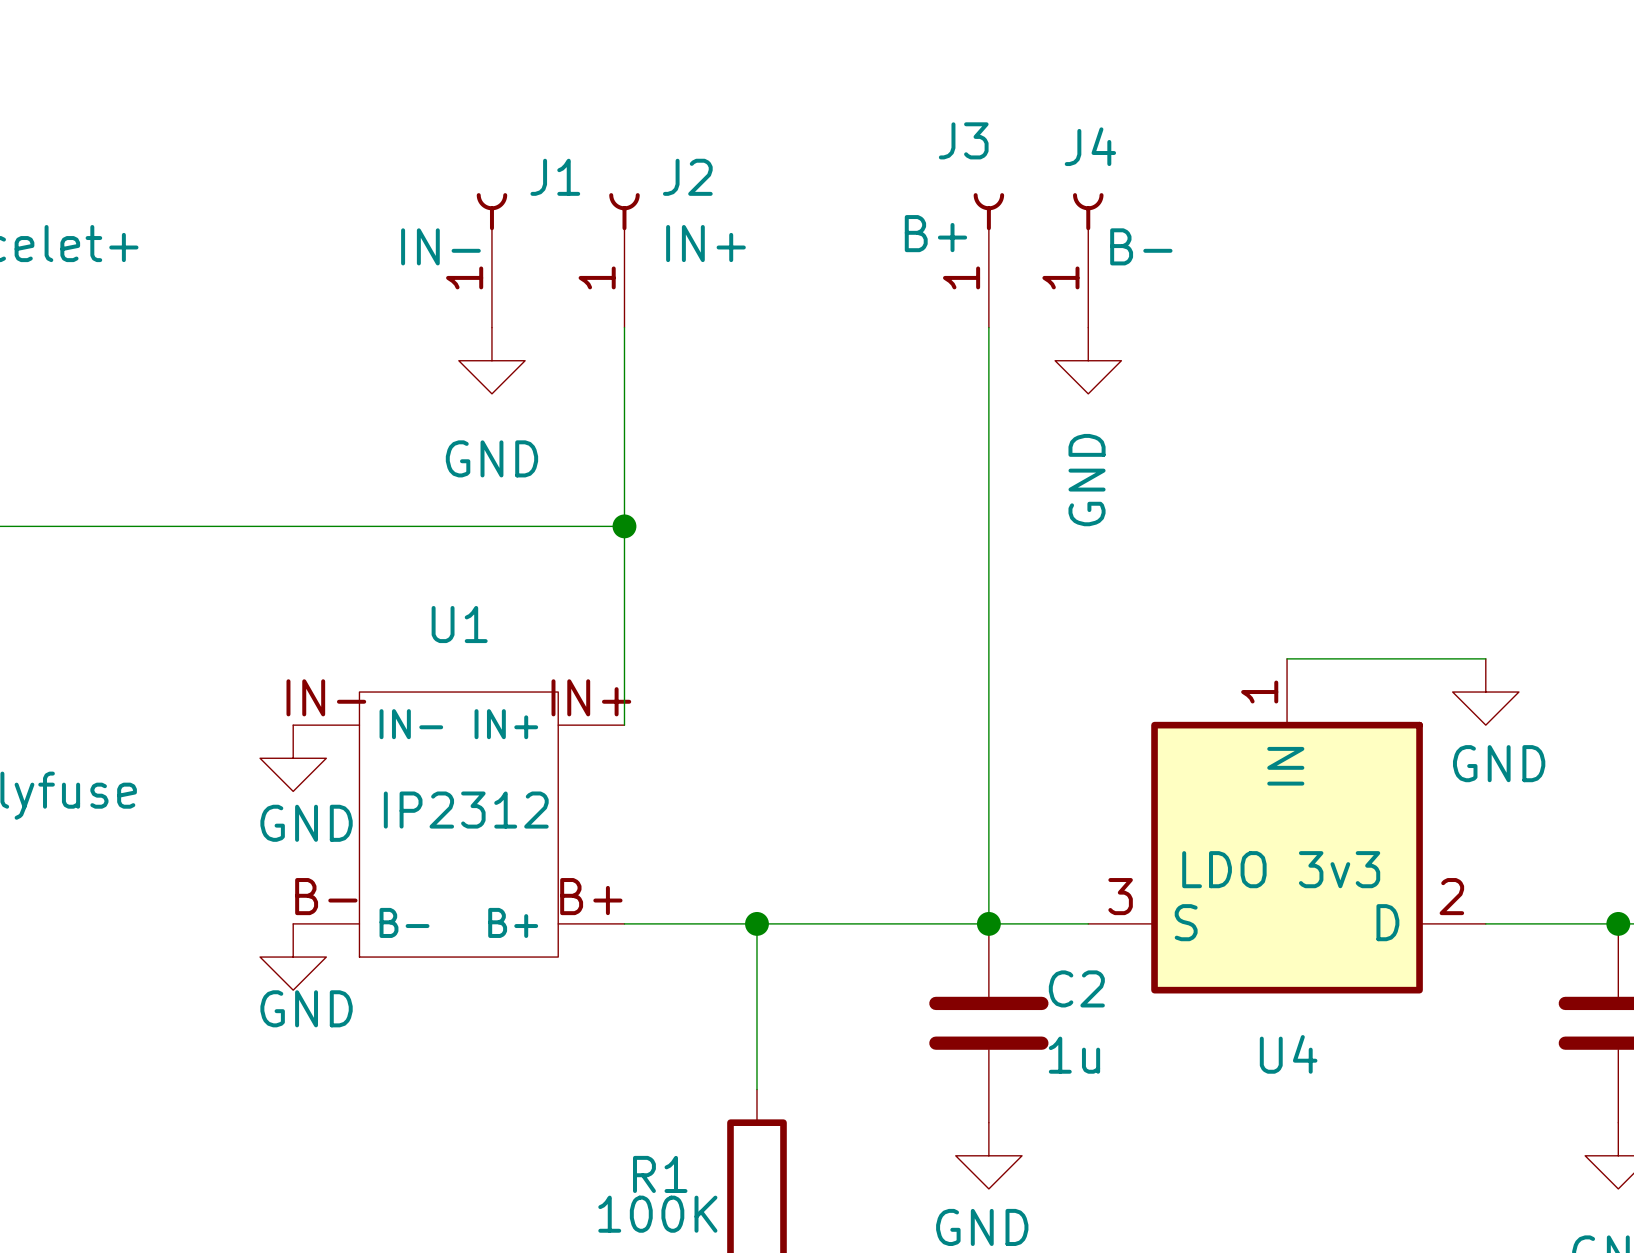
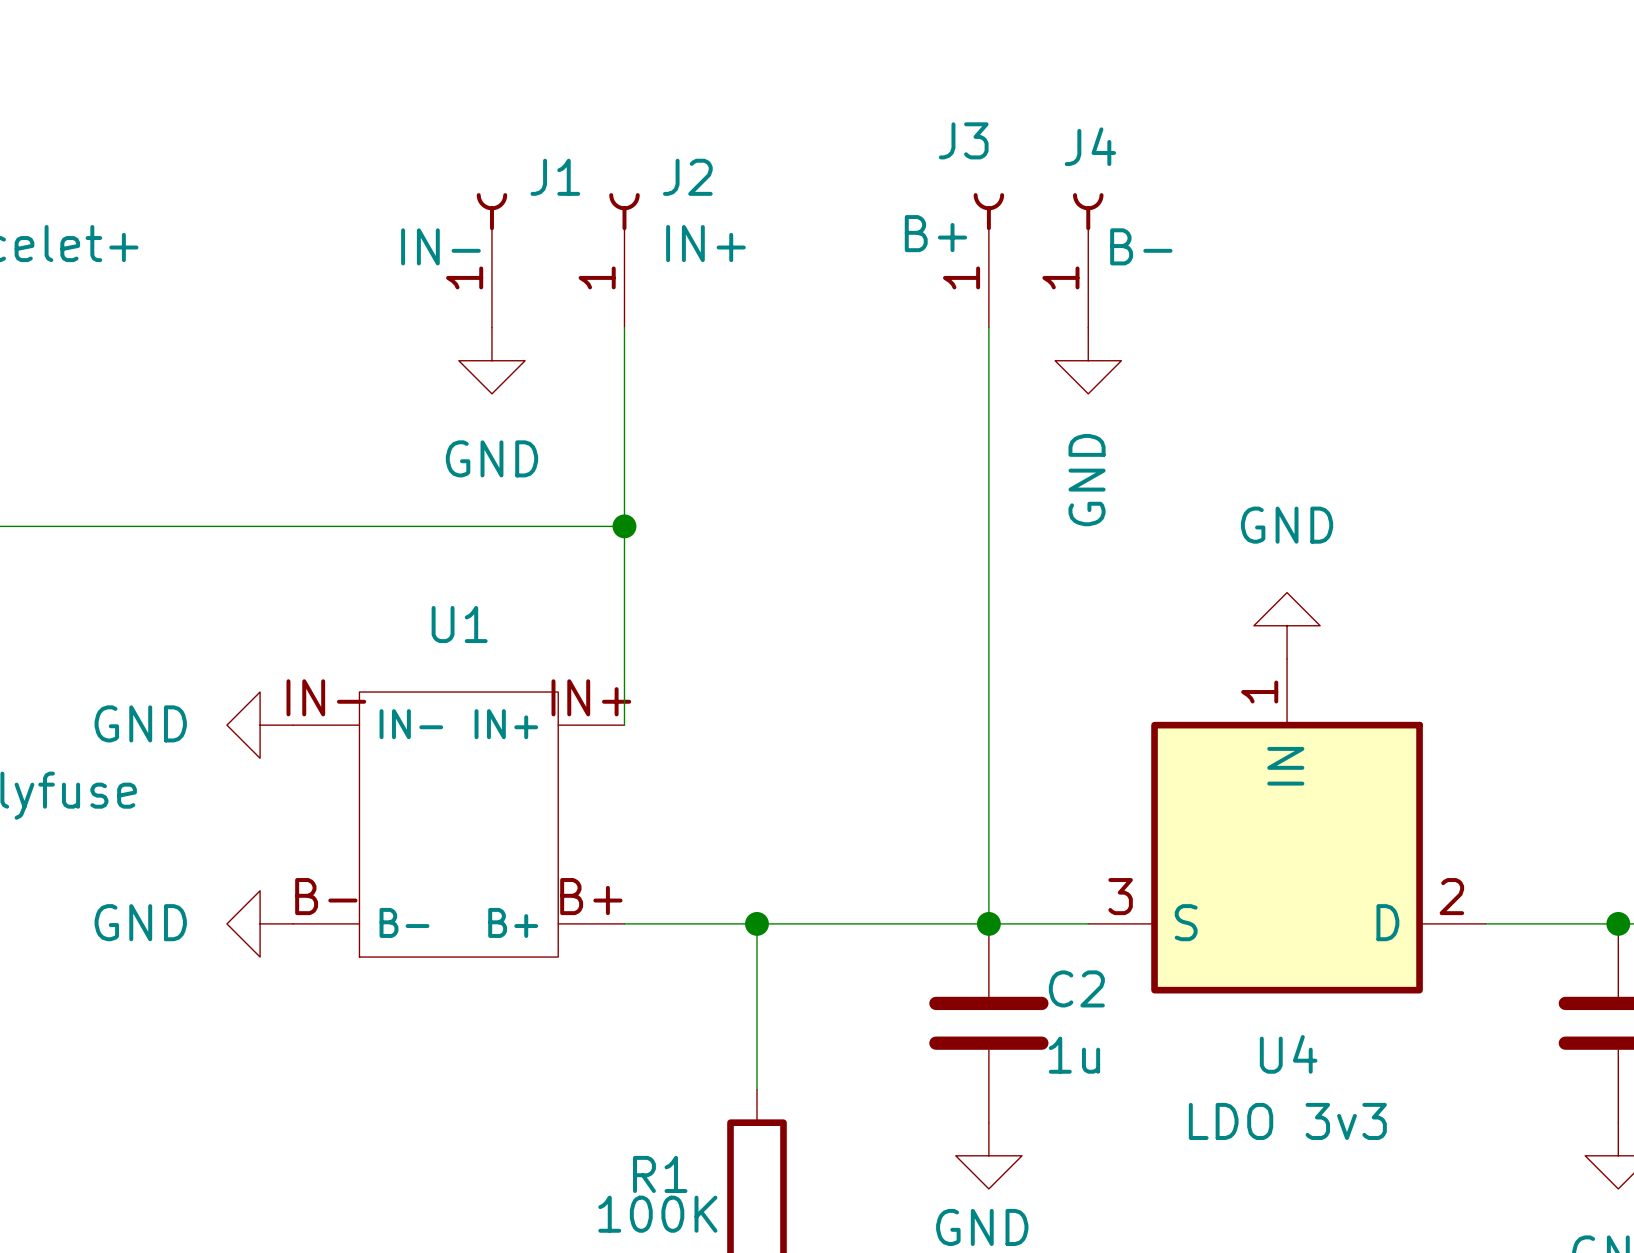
wire: (1287, 658) (1485, 658) -> none
power symbol rotation: 0° (1485, 692) -> 180° (1287, 625)
power symbol position: GND (1485, 692) -> GND (1287, 625)
power symbol rotation: 0° (293, 758) -> 90° clockwise (260, 725)
power symbol position: GND (293, 758) -> GND (260, 725)
U1 value: IP2312 (466, 810) -> none
power symbol text position: GND (306, 823) -> GND (140, 723)
U4 value position: LDO 3v3 (1281, 869) -> LDO 3v3 (1287, 1121)
power symbol rotation: 0° (293, 957) -> 90° clockwise (260, 923)
power symbol position: GND (293, 957) -> GND (260, 923)
power symbol text position: GND (306, 1008) -> GND (140, 922)

